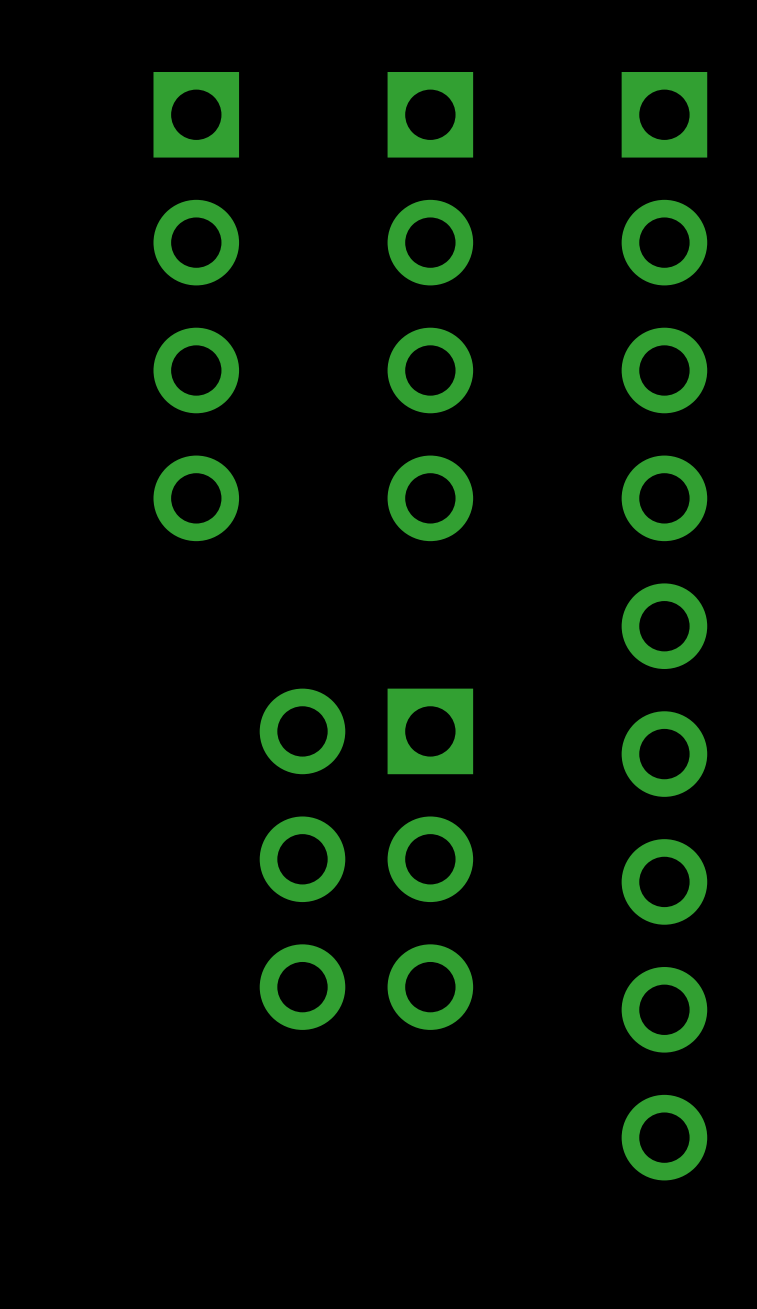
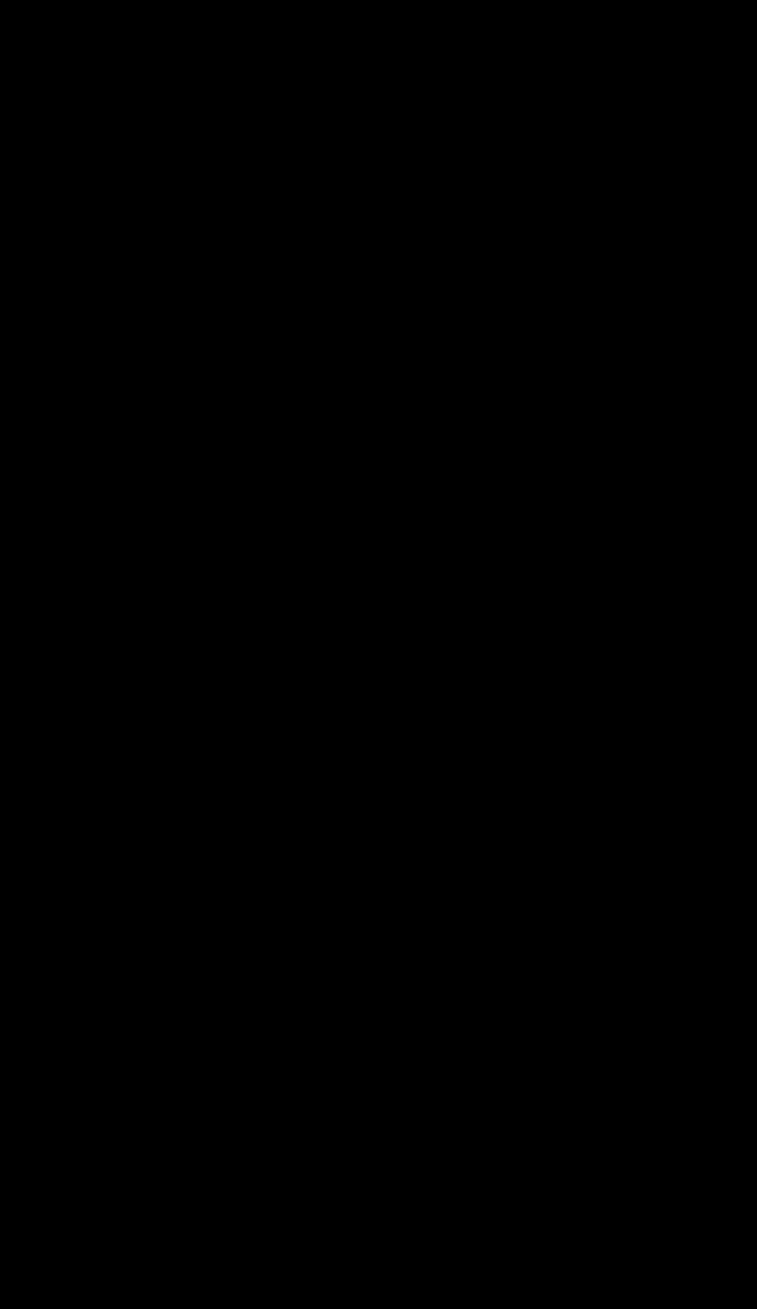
part: (196, 306) -> none
part: (430, 306) -> none
part: (664, 626) -> none
part: (366, 859) -> none

